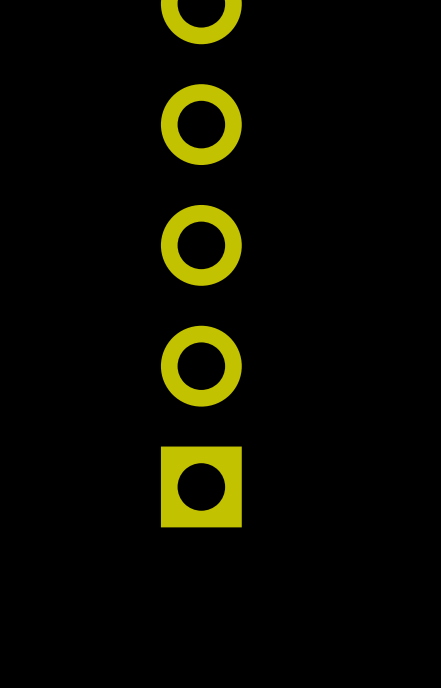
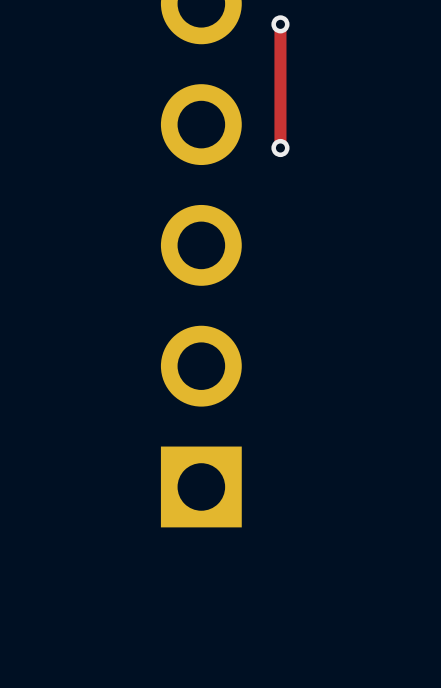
track: none -> (280, 24) (280, 148)
via: none -> (280, 24)
via: none -> (280, 148)

